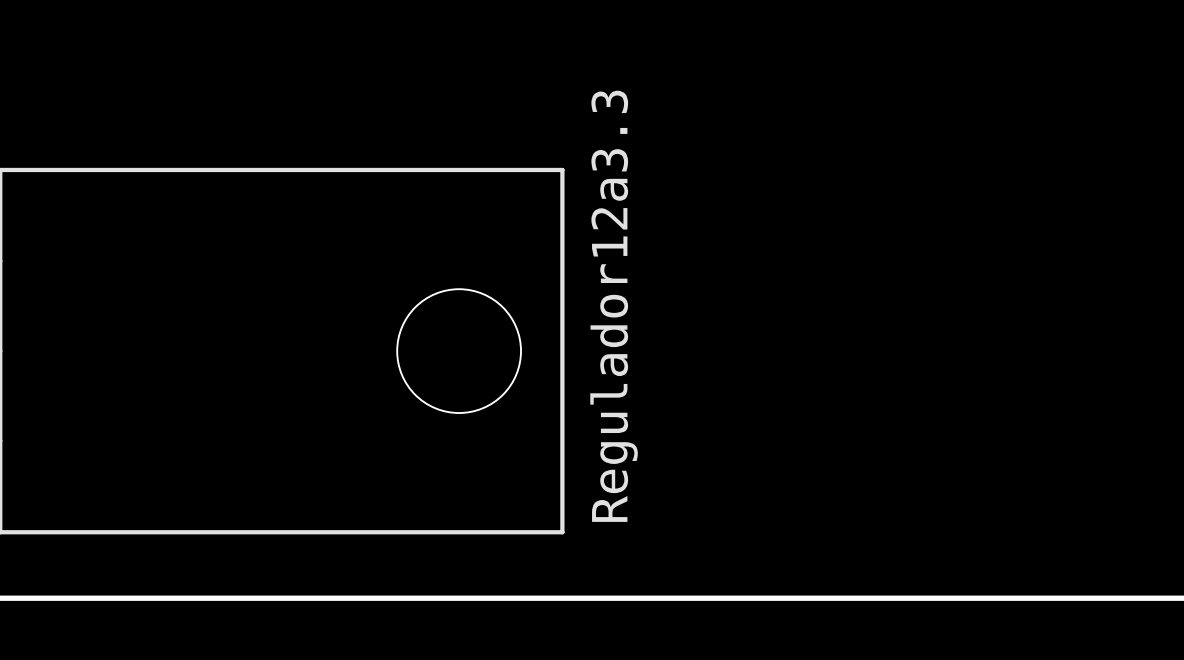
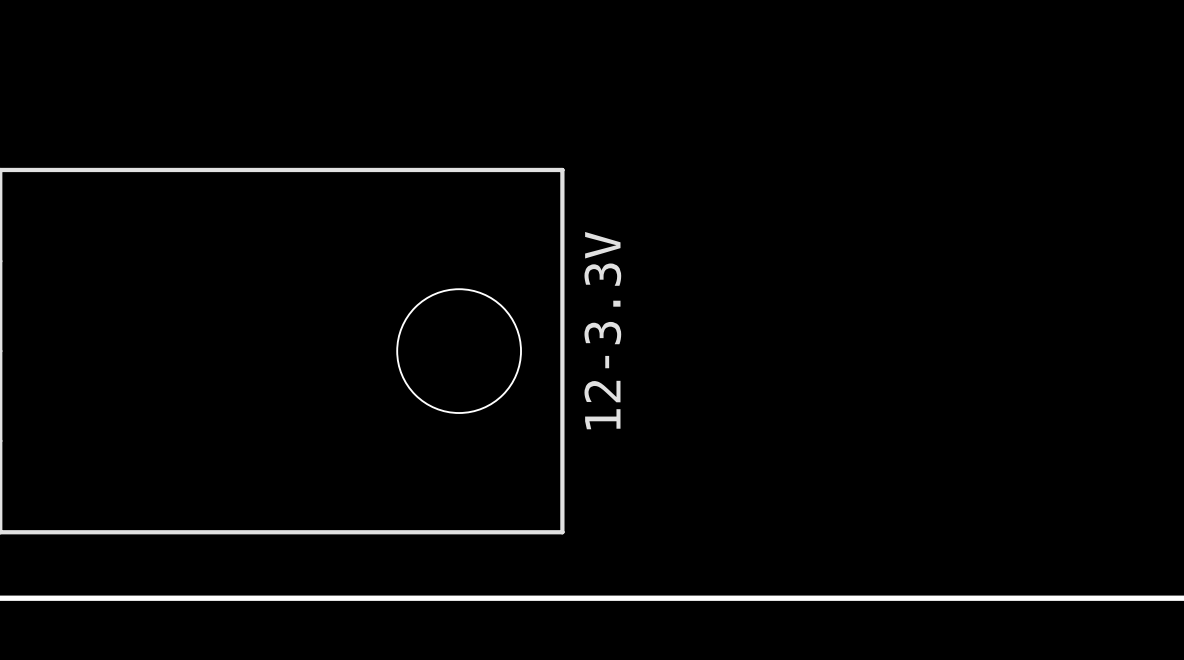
Regulador12a3.3 name: Regulador12a3.3 (614, 306) -> 12-3.3V (602, 330)

